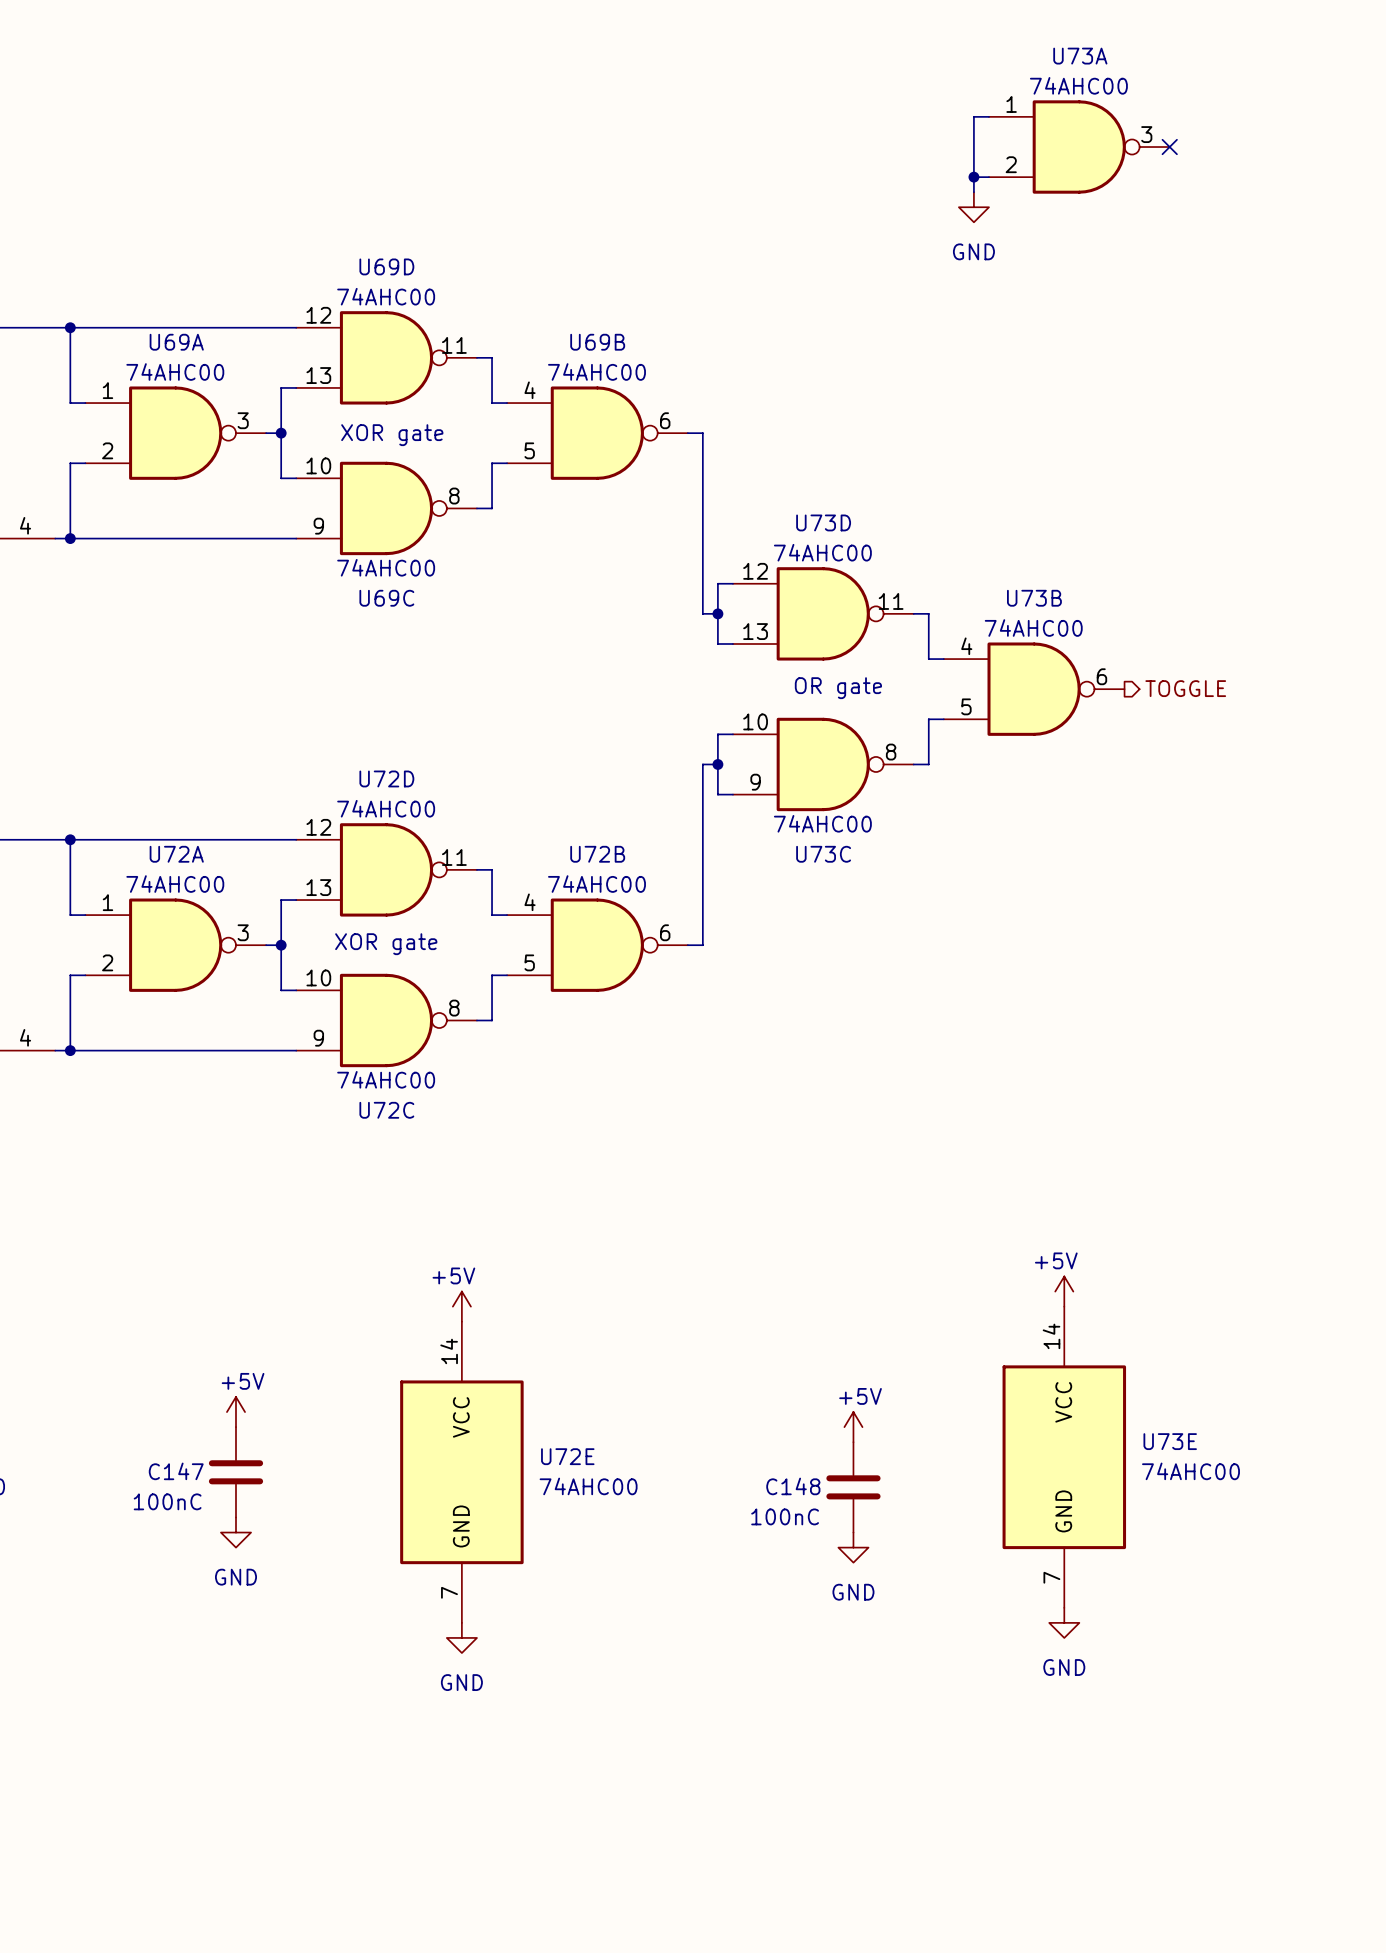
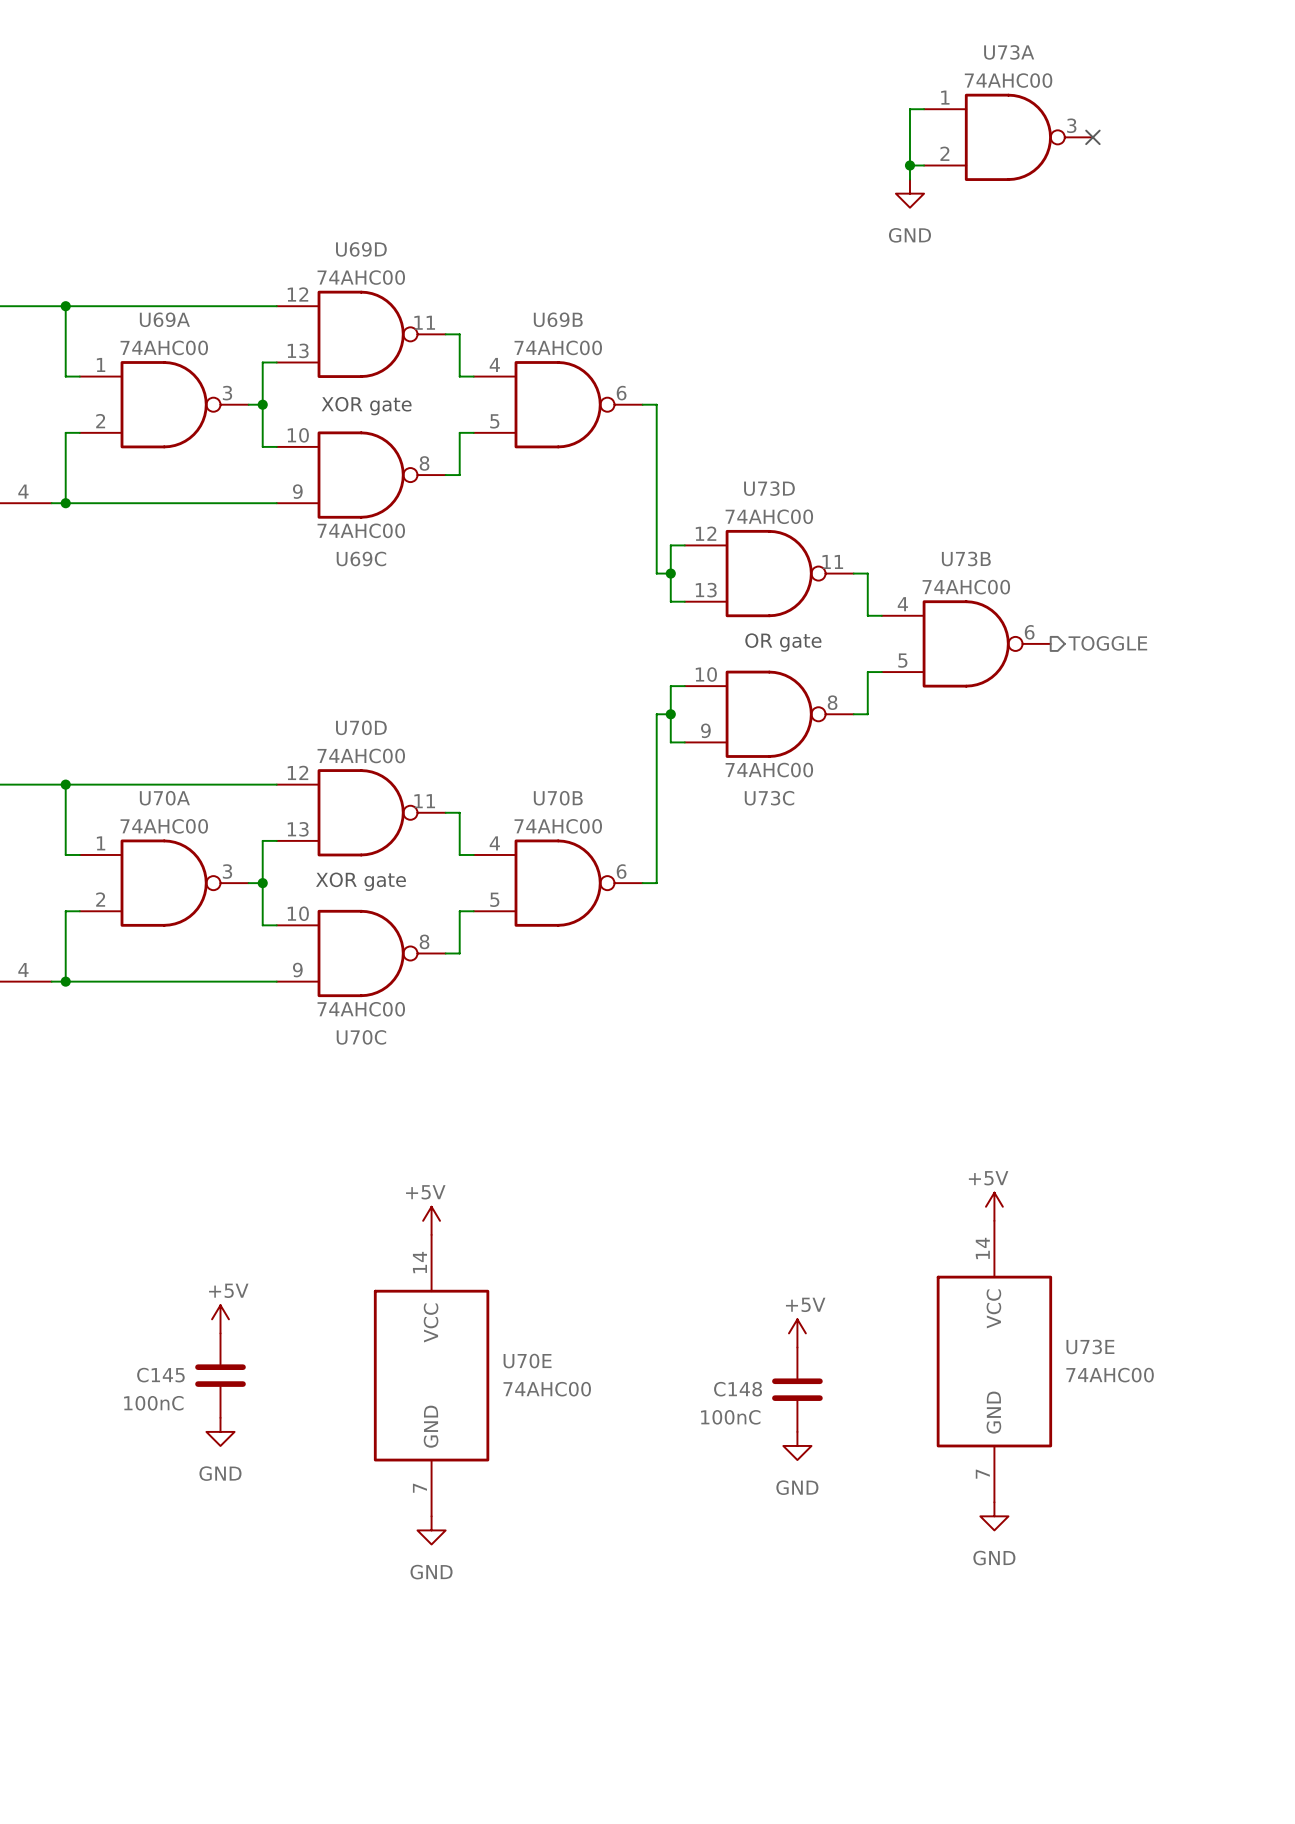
U72D name: U72D (386, 778) -> U70D (361, 727)
U72A name: U72A (176, 854) -> U70A (164, 798)
U72B name: U72B (597, 854) -> U70B (558, 798)
U72C name: U72C (386, 1110) -> U70C (361, 1037)
U72E name: U72E (567, 1456) -> U70E (527, 1361)
C147 name: C147 (176, 1471) -> C145 (160, 1375)

